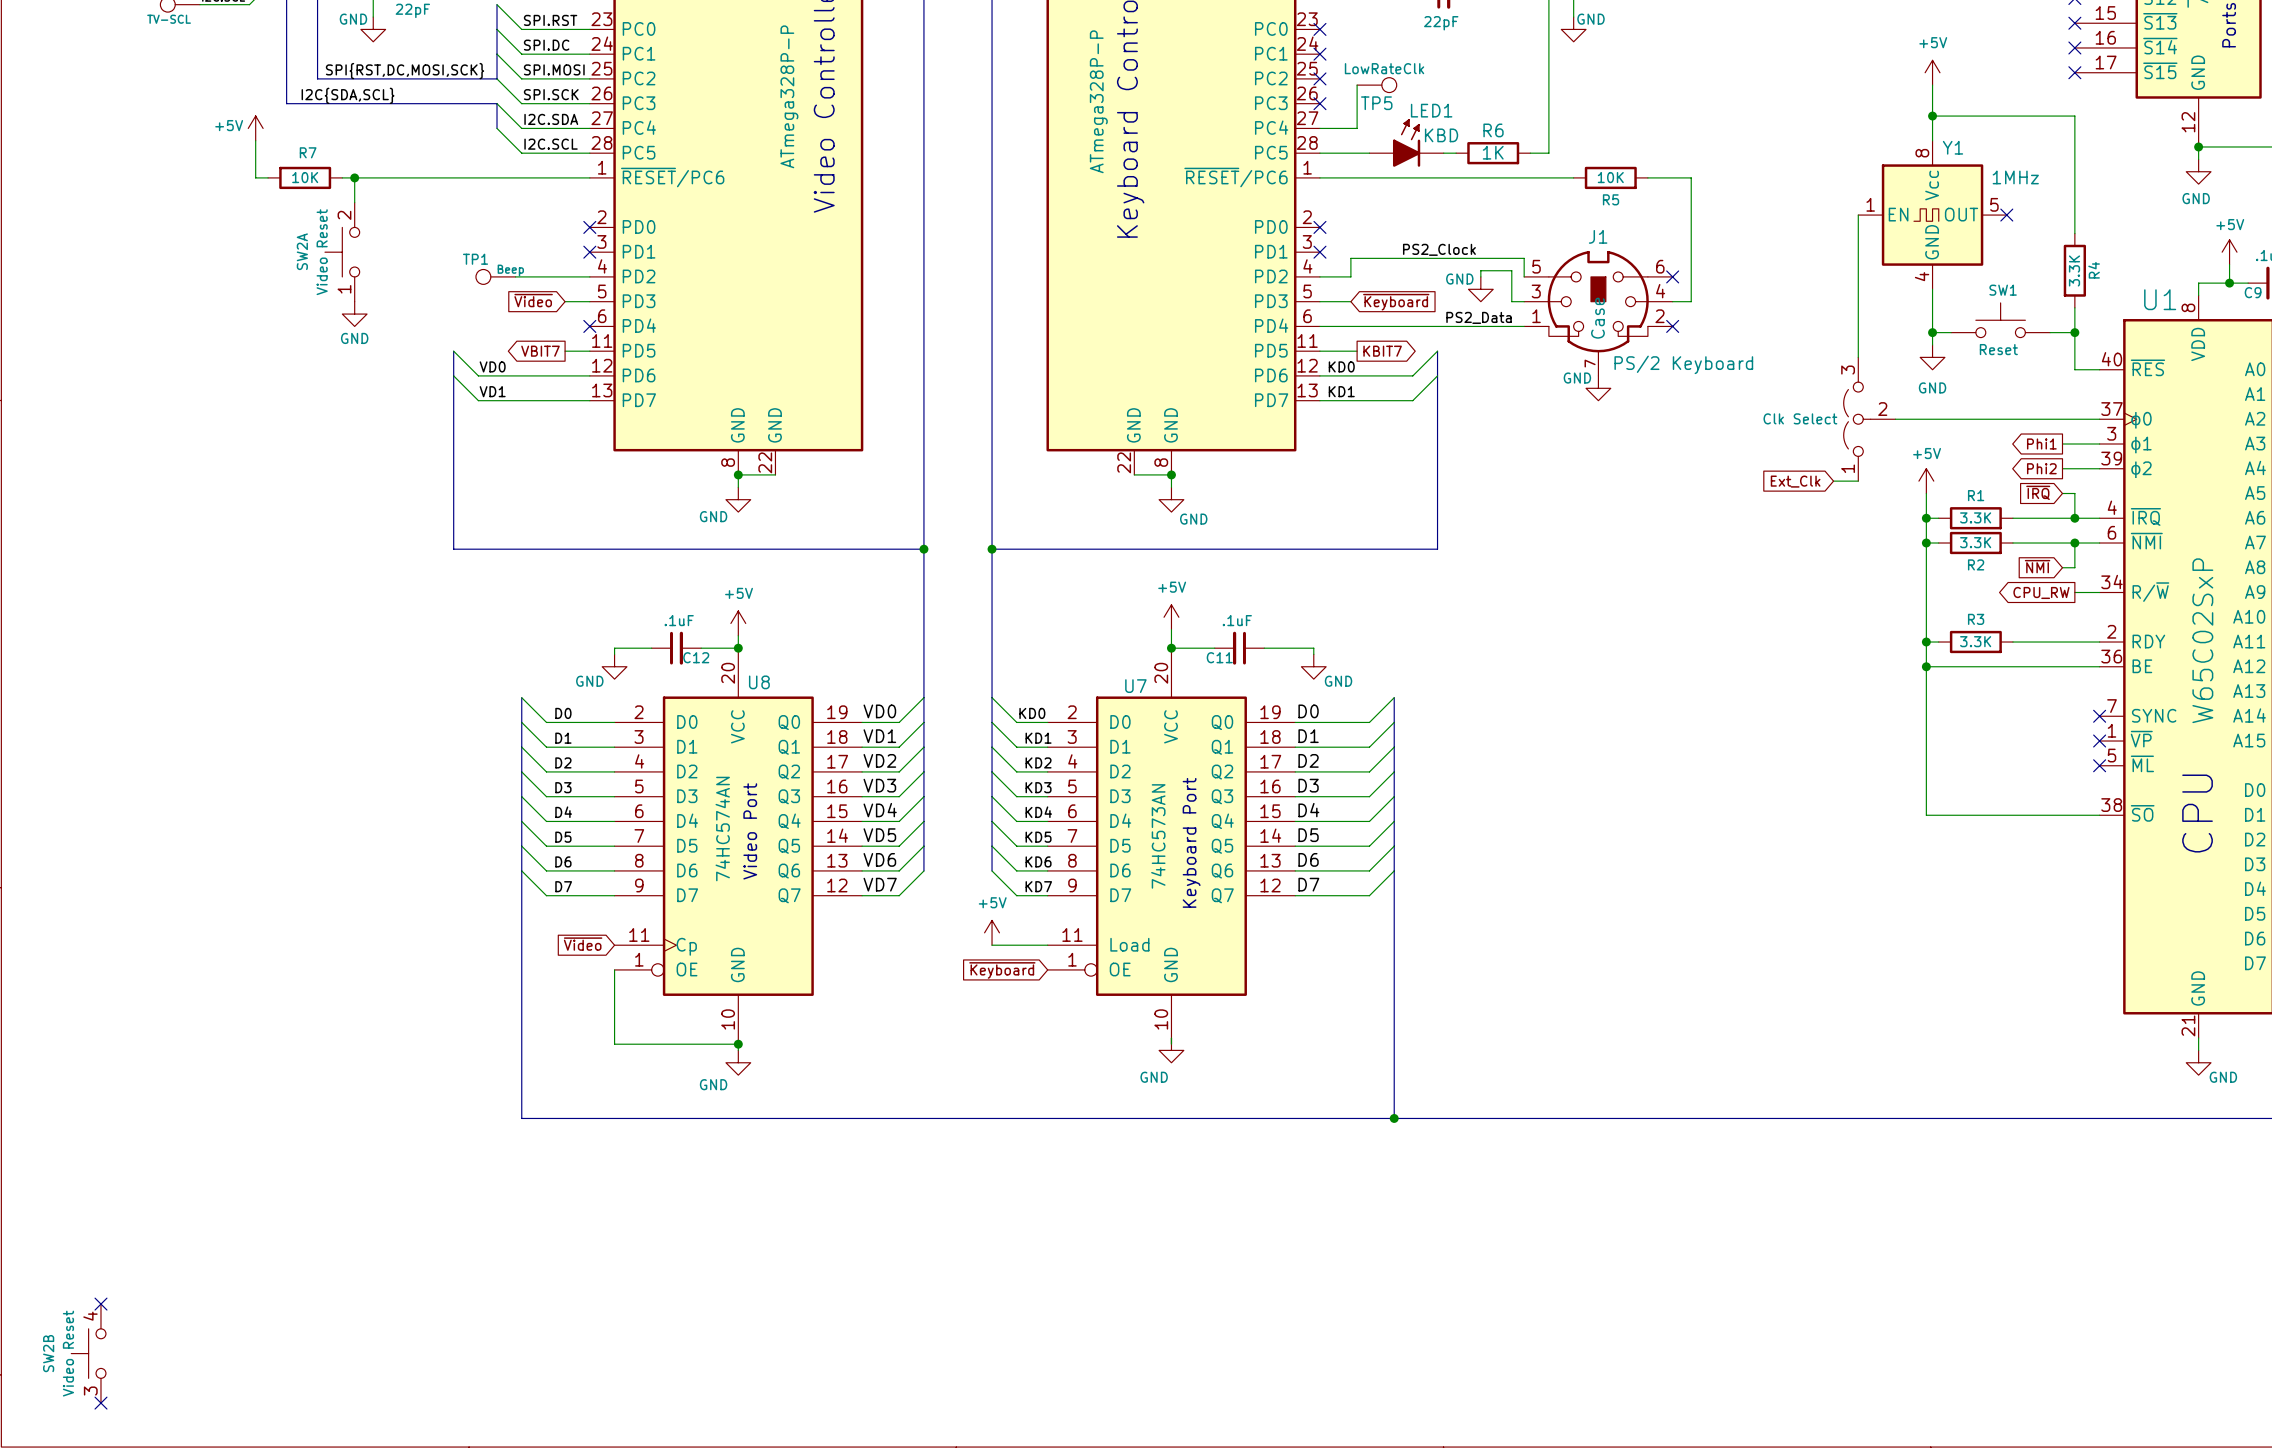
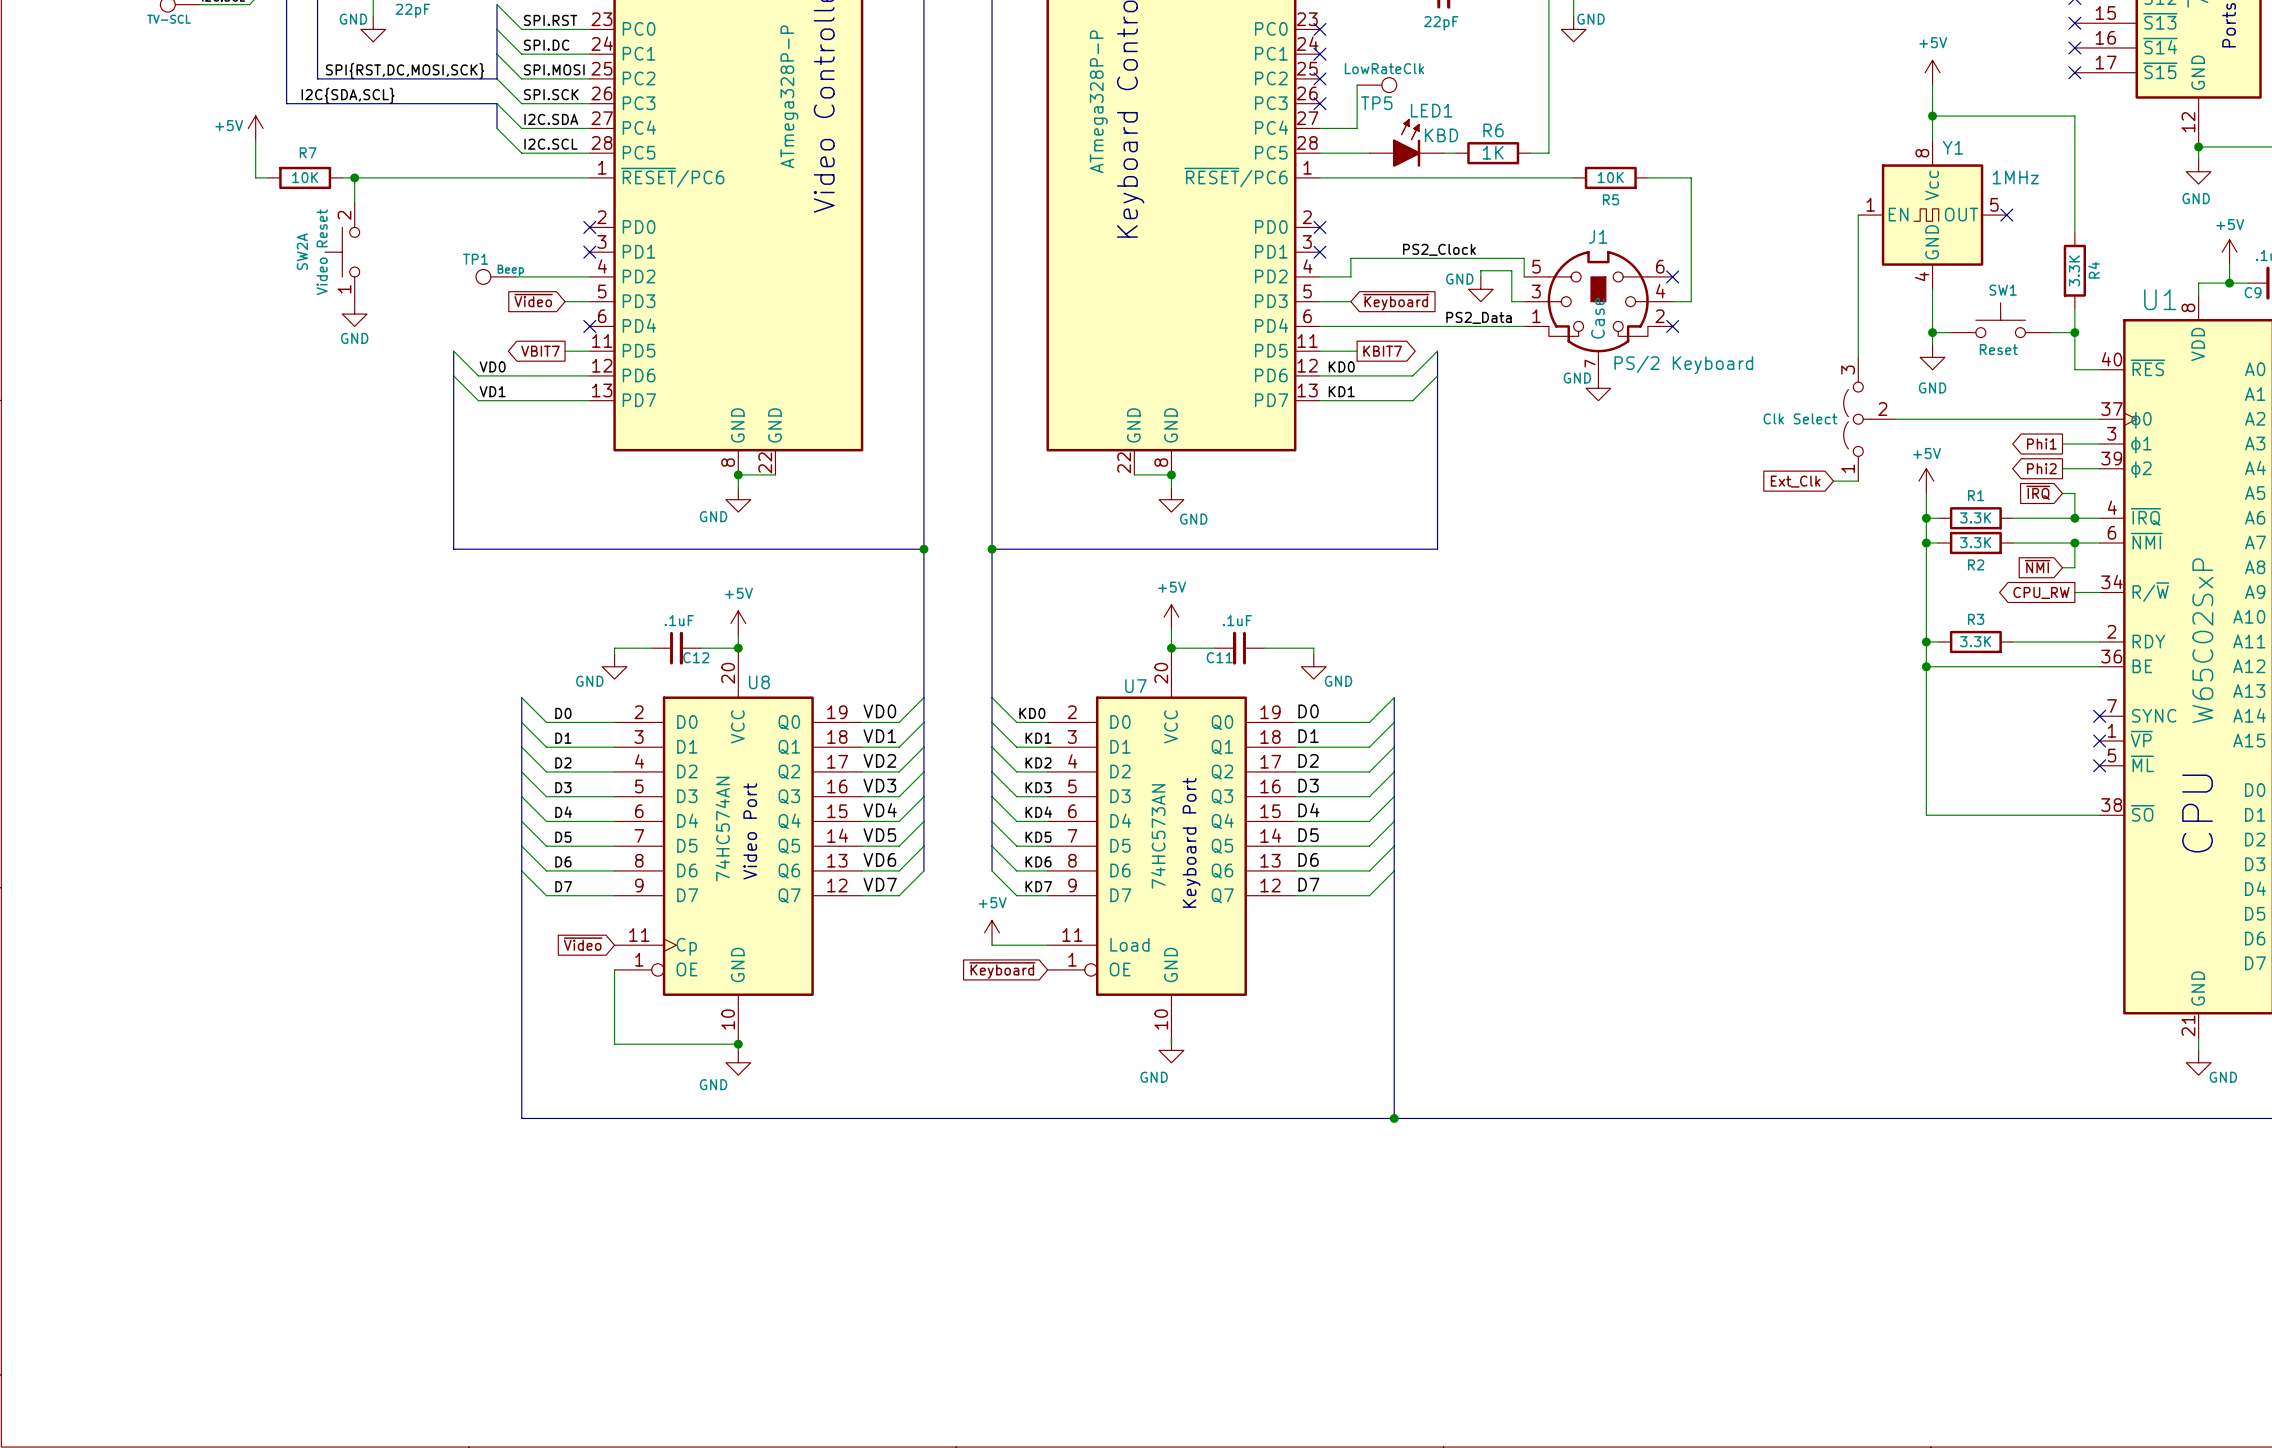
no-connect mark: (100, 1304) -> none
SW2B: Video Reset (88, 1353) -> none
no-connect mark: (100, 1403) -> none

